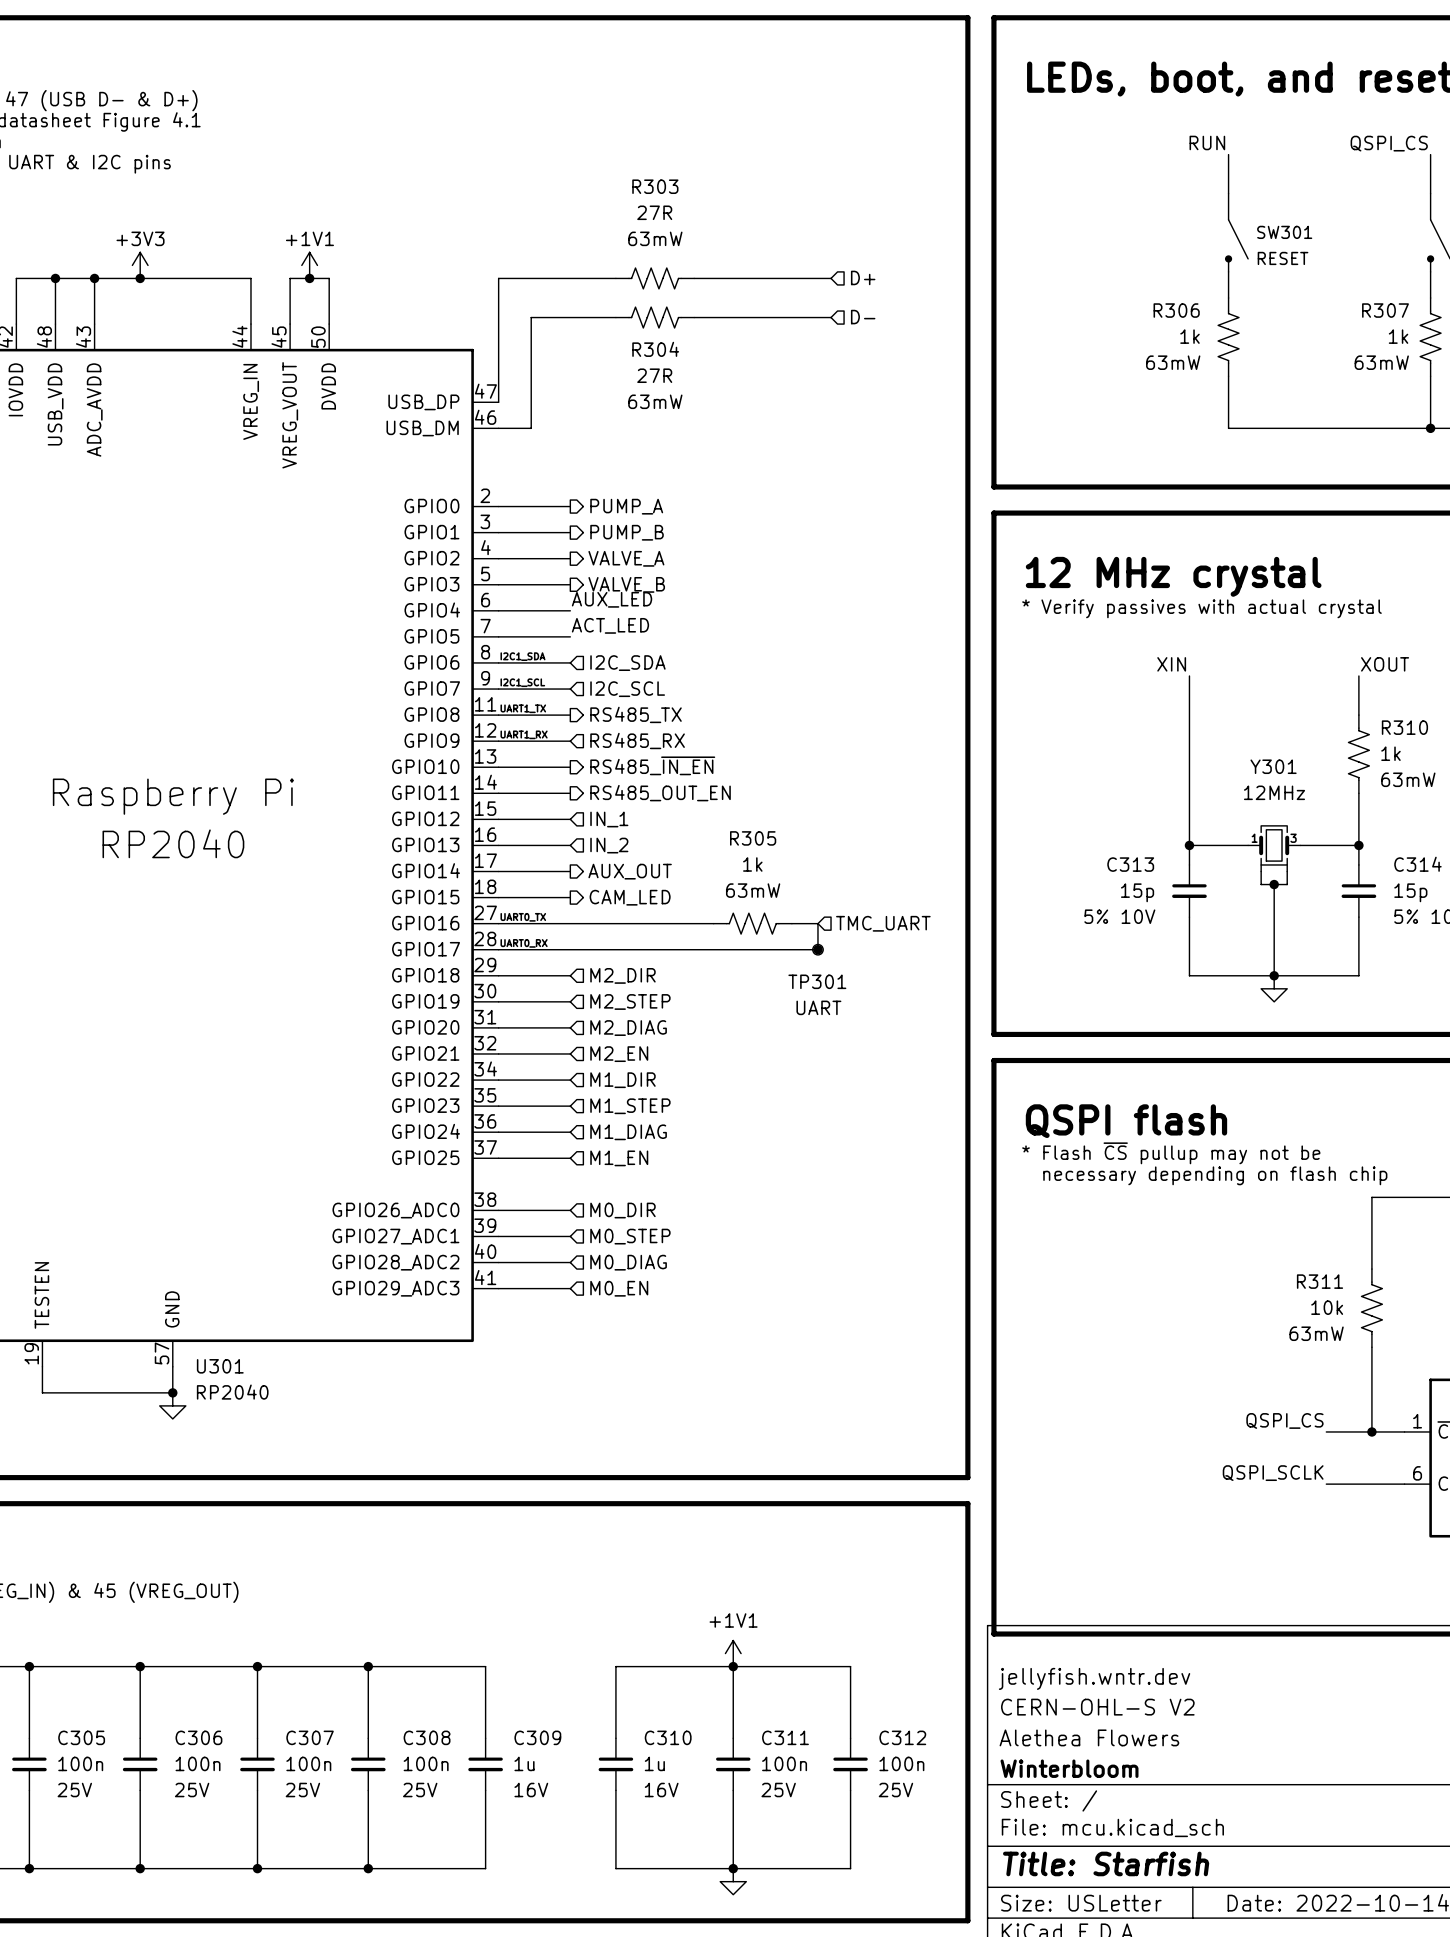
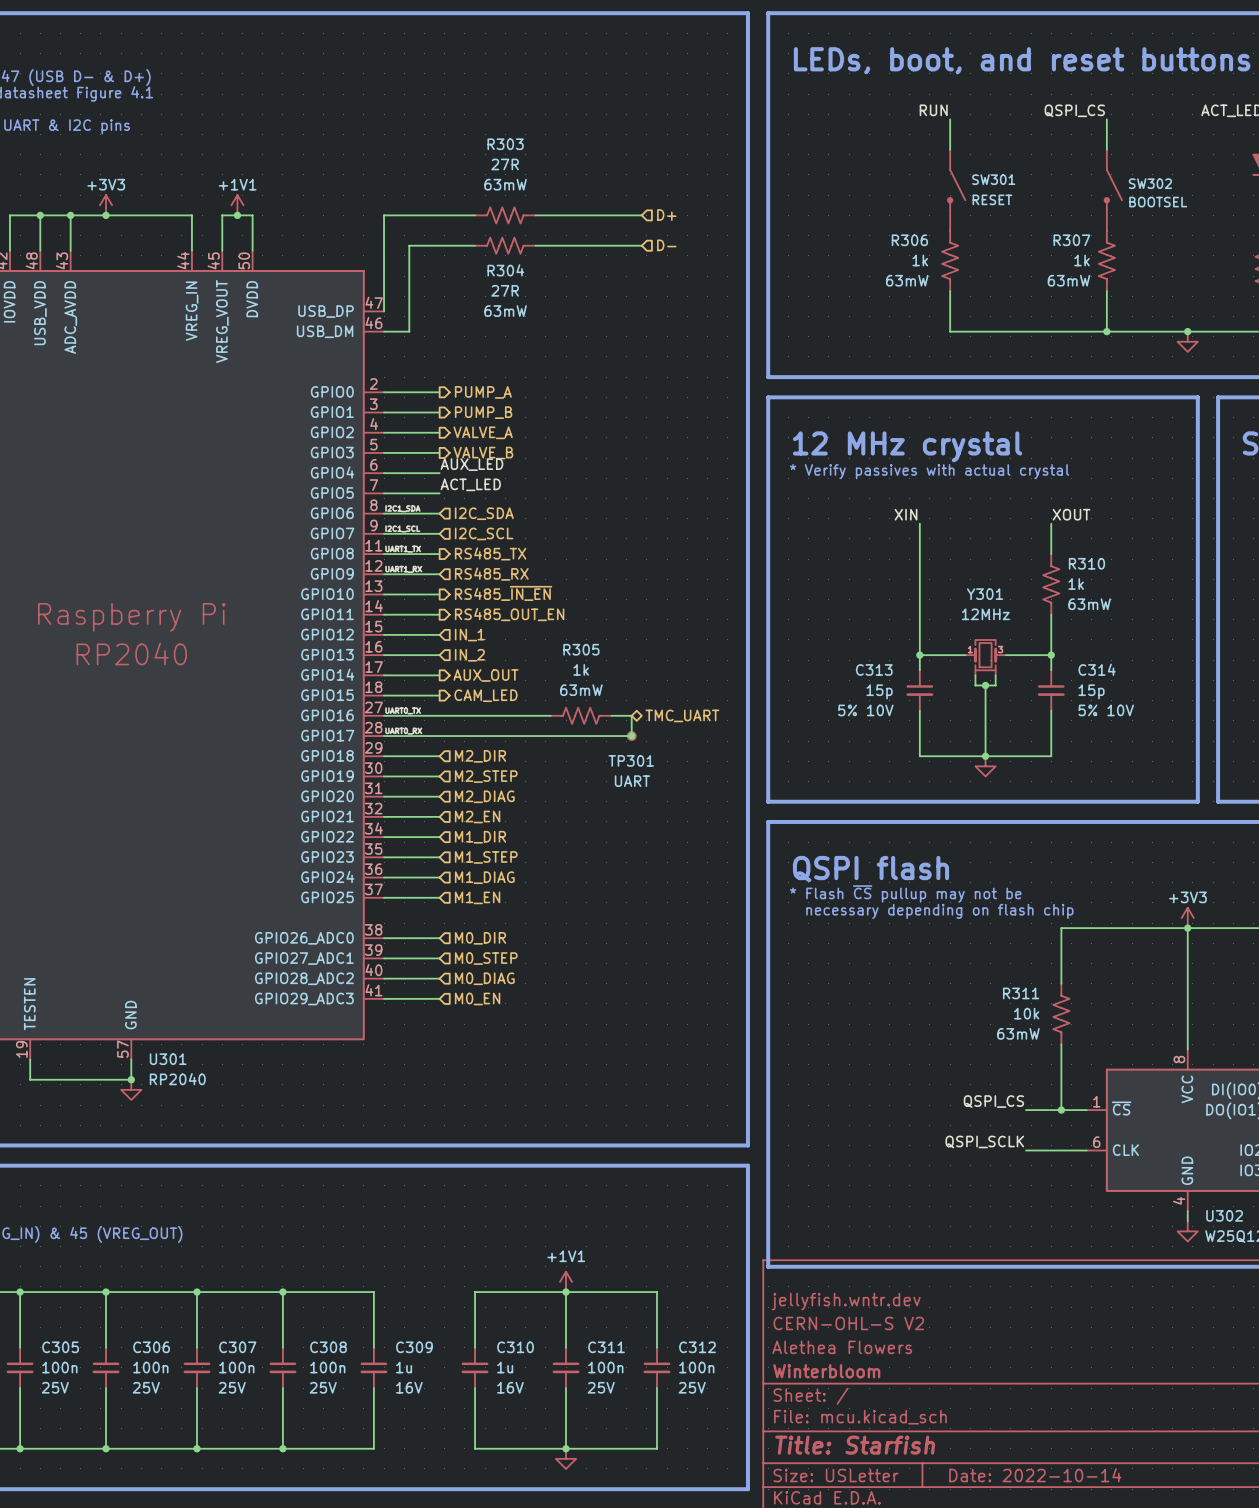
hierarchical label shape: input (883, 923) -> bidirectional (682, 715)

